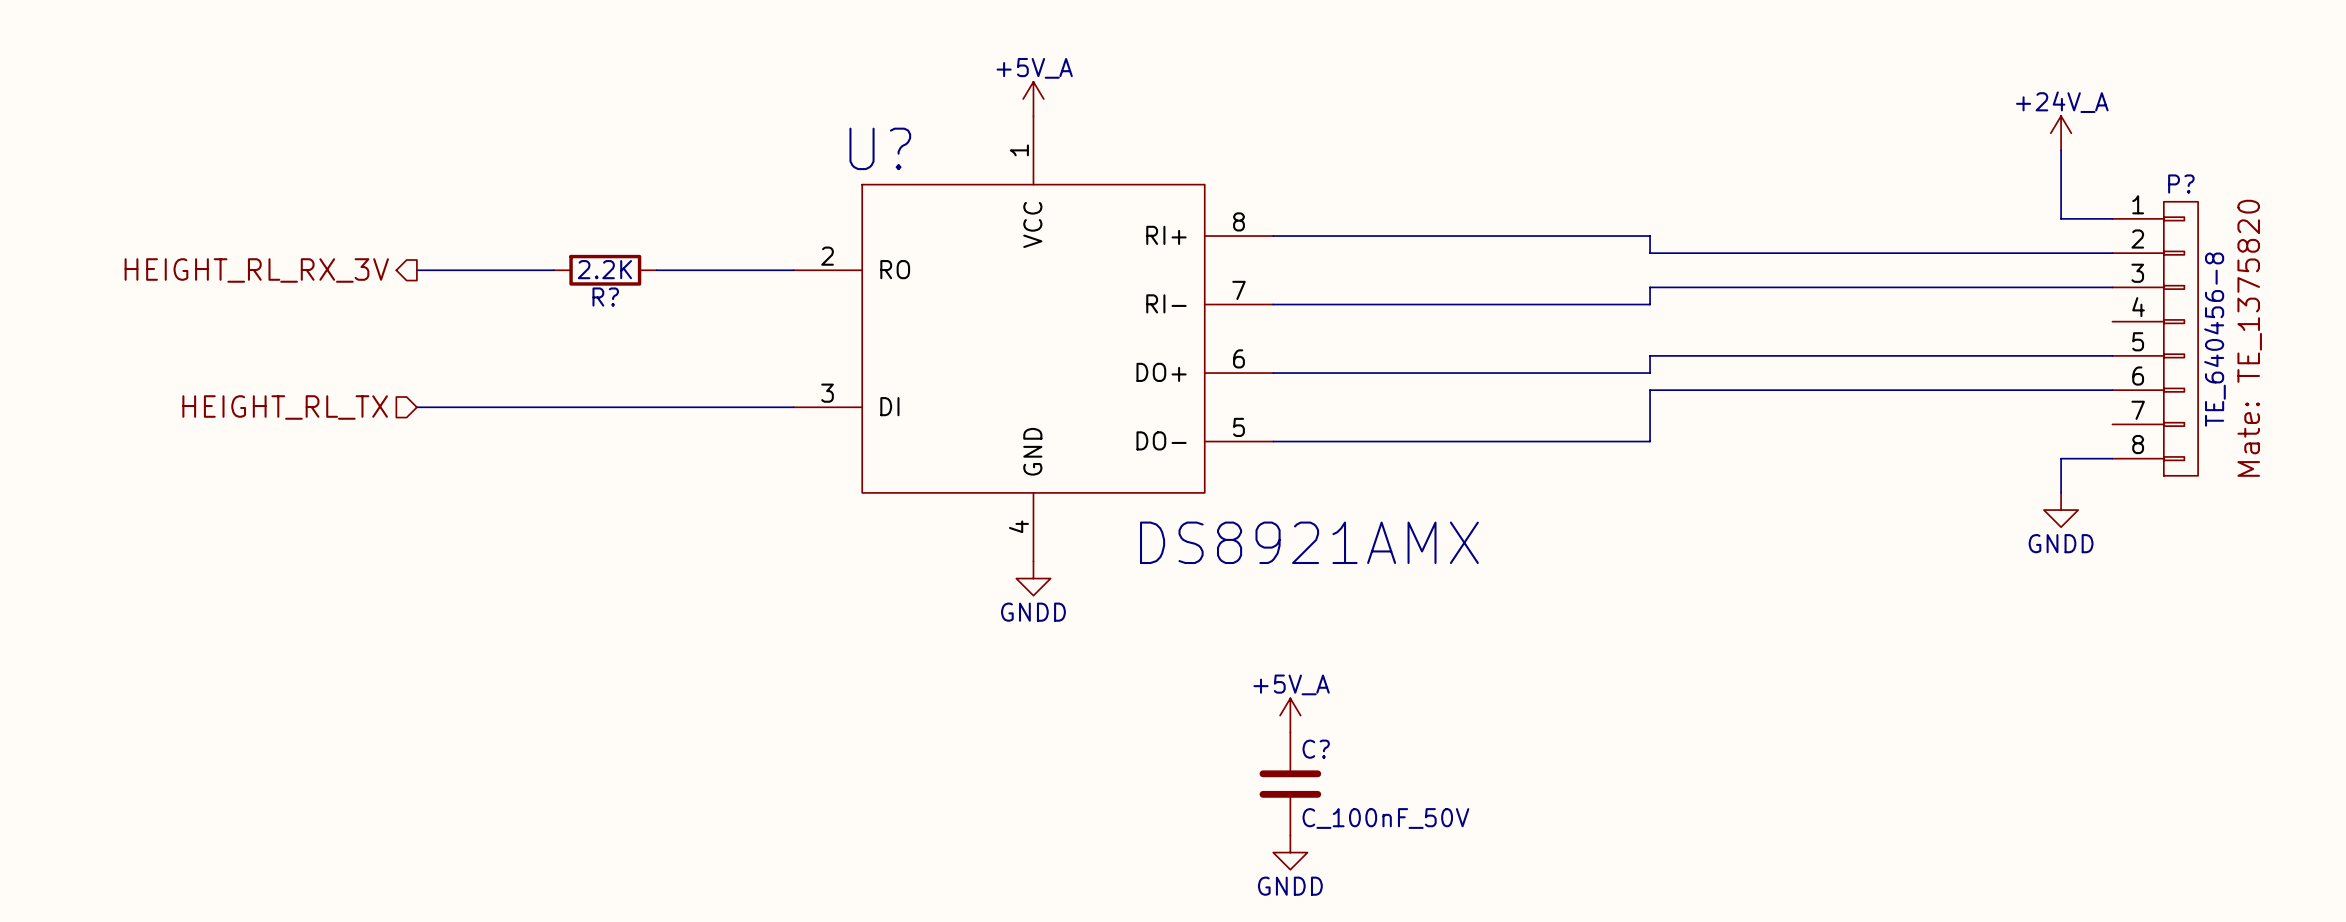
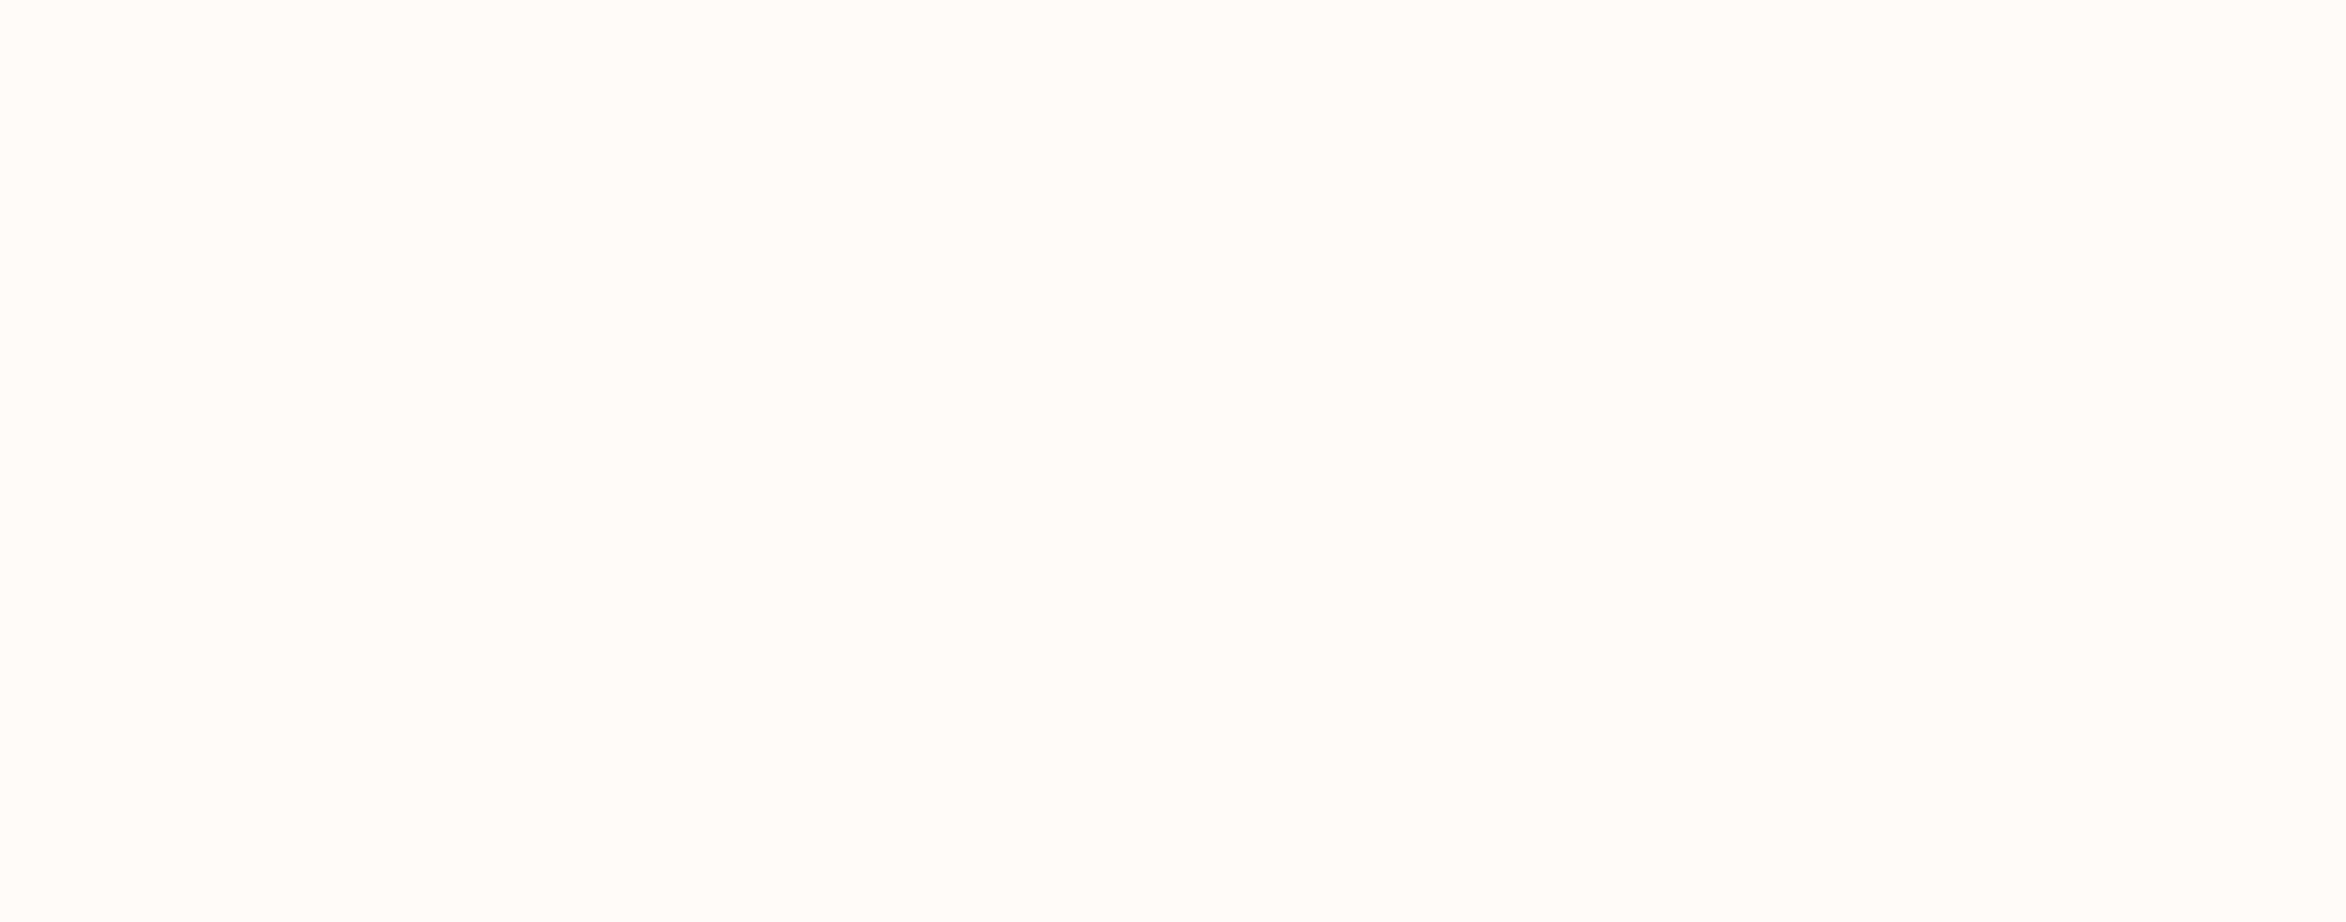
power symbol: +5V_A (1033, 99) -> none
power symbol: +24V_A (2061, 133) -> none
wire: (2061, 150) (2061, 218) (2112, 218) -> none
wire: (1273, 236) (1650, 236) (1650, 253) (2112, 253) -> none
hierarchical label: HEIGHT_RL_RX_3V (256, 270) -> none
wire: (416, 270) (553, 270) -> none
R?: 2.2K (605, 270) -> none
wire: (656, 270) (793, 270) -> none
wire: (2112, 287) (1650, 287) (1650, 304) (1273, 304) -> none
U?: DS8921AMX (1033, 338) -> none
P?: TE_640456-8 (2155, 338) -> none
wire: (2112, 355) (1650, 355) (1650, 373) (1273, 373) -> none
wire: (2112, 390) (1650, 390) (1650, 441) (1273, 441) -> none
hierarchical label: HEIGHT_RL_TX (285, 407) -> none
wire: (416, 407) (793, 407) -> none
wire: (2112, 458) (2061, 458) (2061, 492) -> none
power symbol: GNDD (2061, 510) -> none
power symbol: GNDD (1033, 578) -> none
power symbol: +5V_A (1290, 715) -> none
C?: C_100nF_50V (1290, 784) -> none
power symbol: GNDD (1290, 852) -> none

